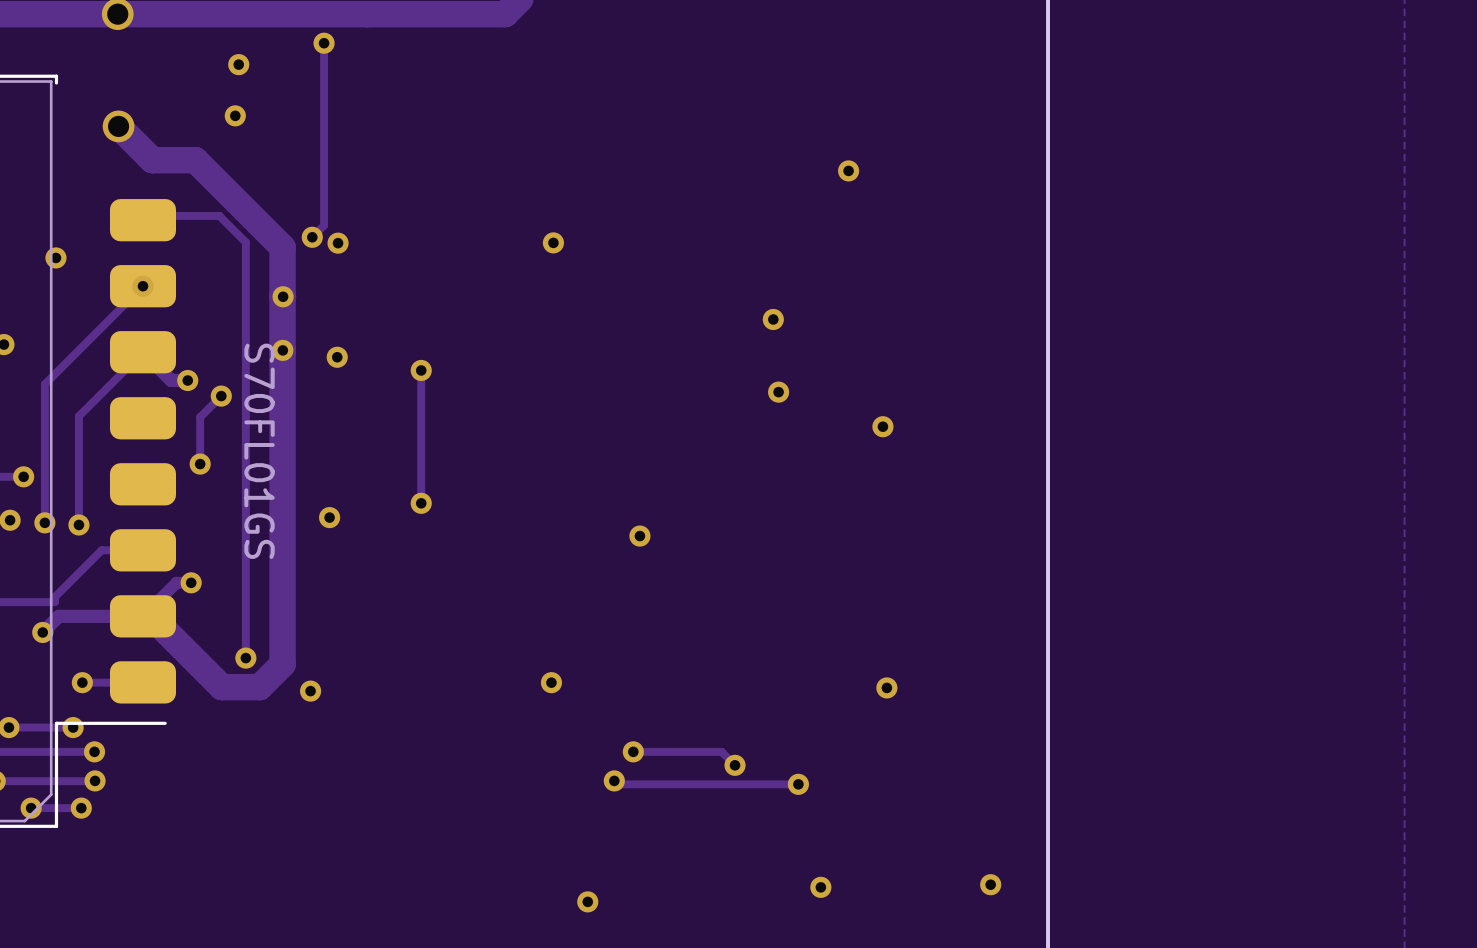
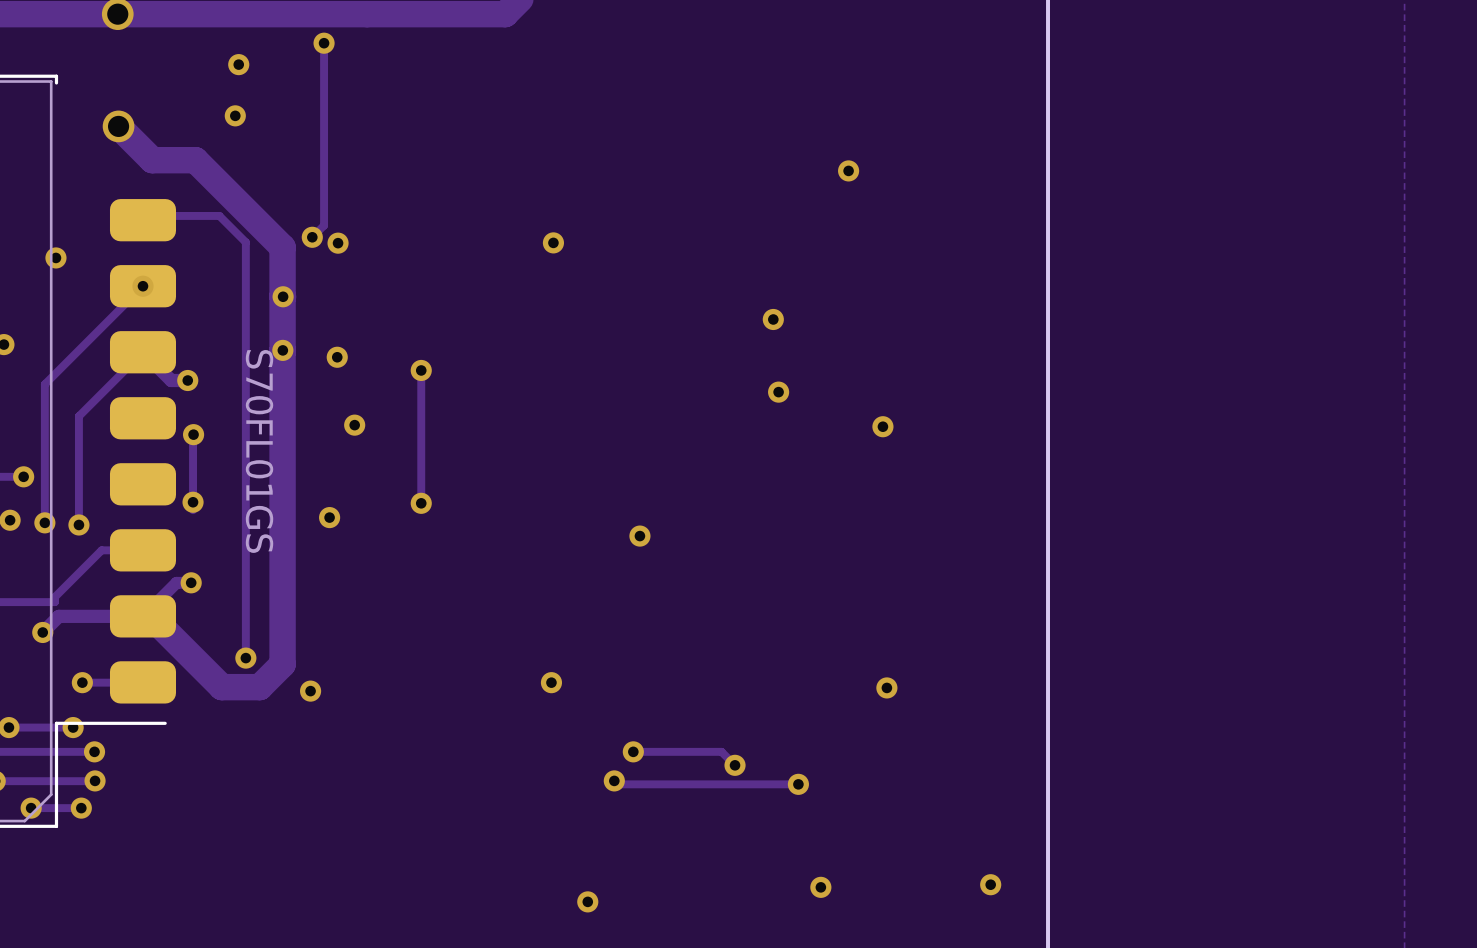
track: (221, 396) (200, 417) (200, 464) -> none
via: (221, 396) -> none
via: none -> (354, 425)
track: none -> (193, 434) (193, 510)
via: none -> (193, 434)
via: (200, 464) -> none
via: none -> (193, 502)

